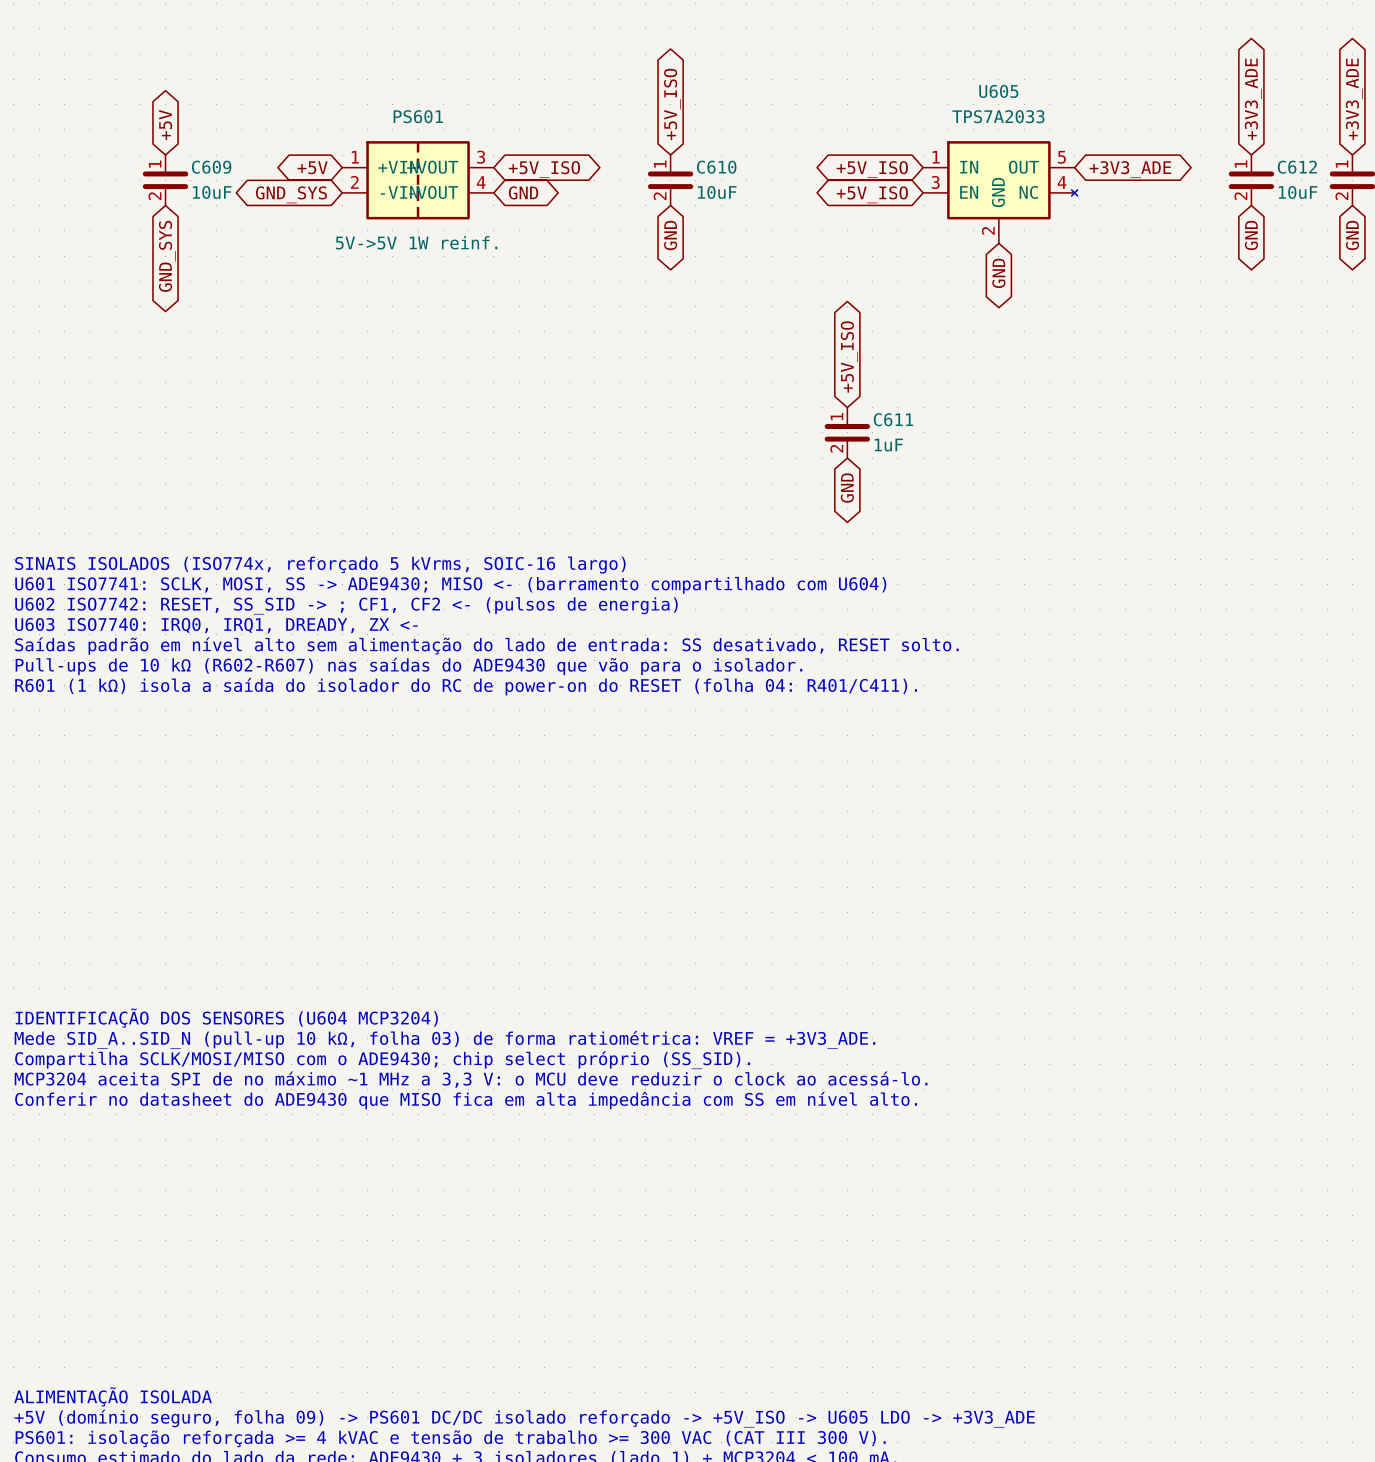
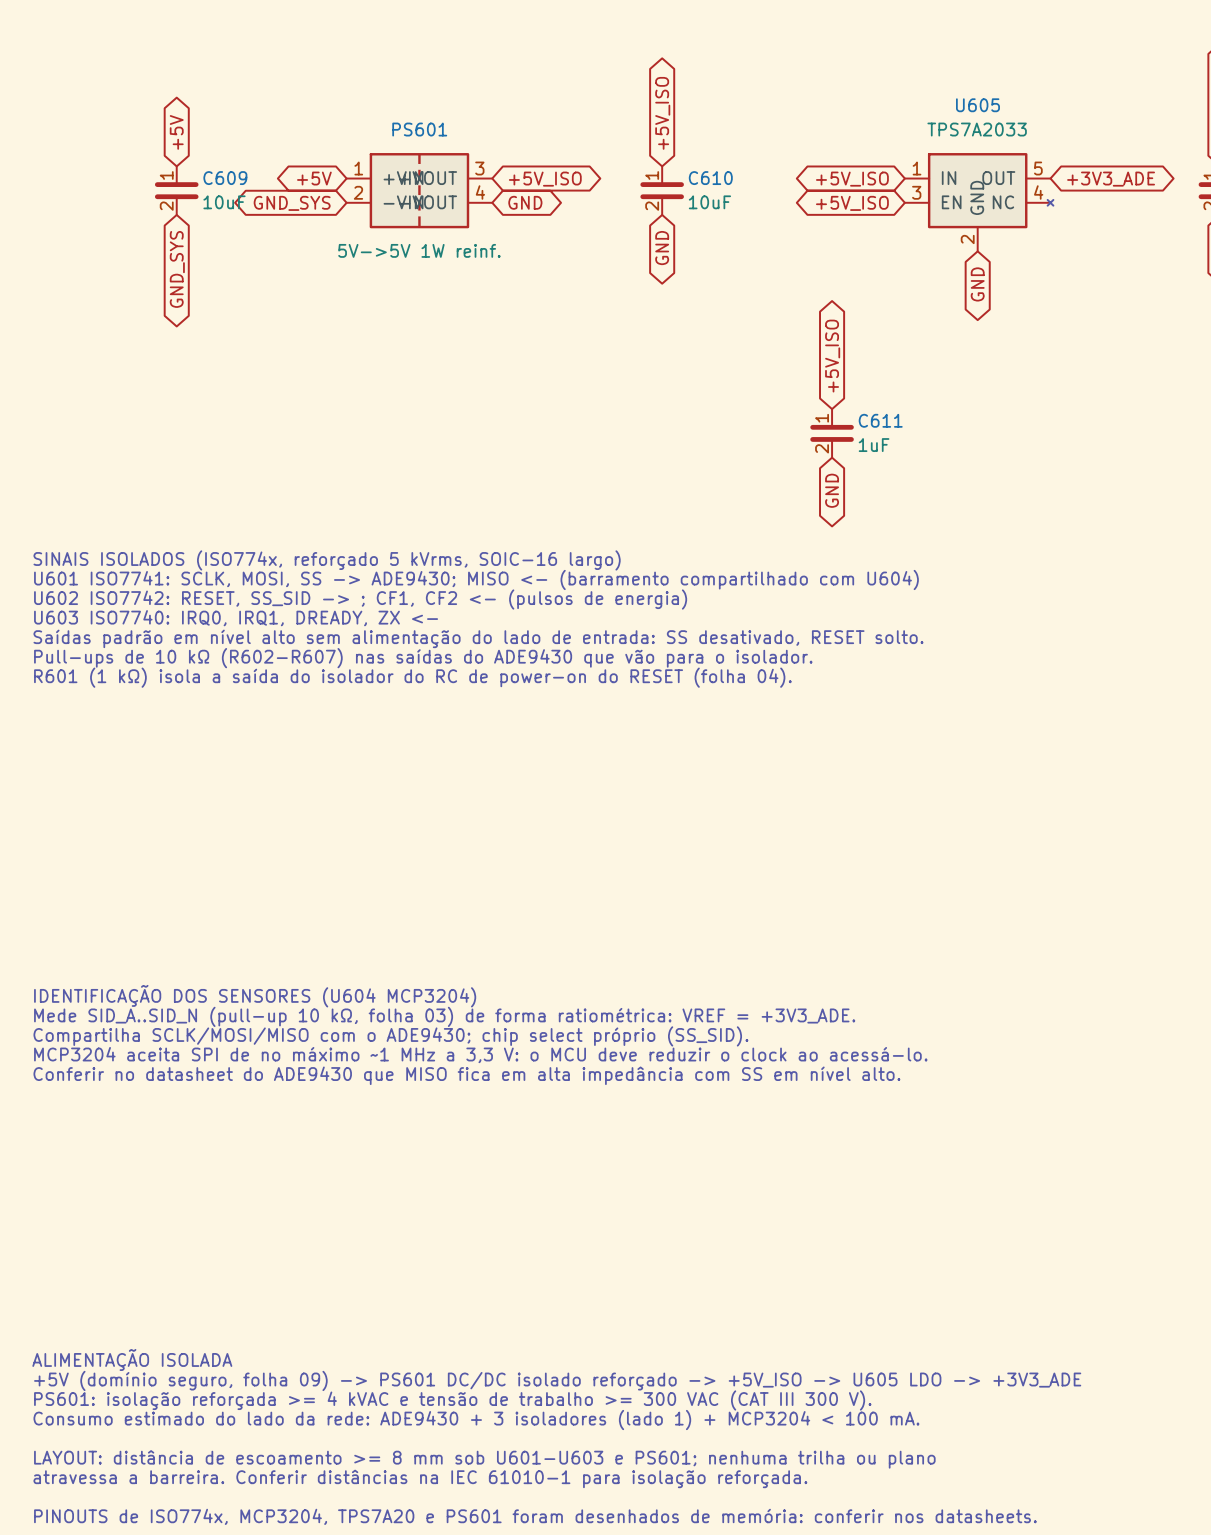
text: R601 (1 kΩ) isola a saída do isolador do RC de power-on do RESET (folha 04: R401/C411). (466, 686) -> R601 (1 kΩ) isola a saída do isolador do RC de power-on do RESET (folha 04). (412, 677)

